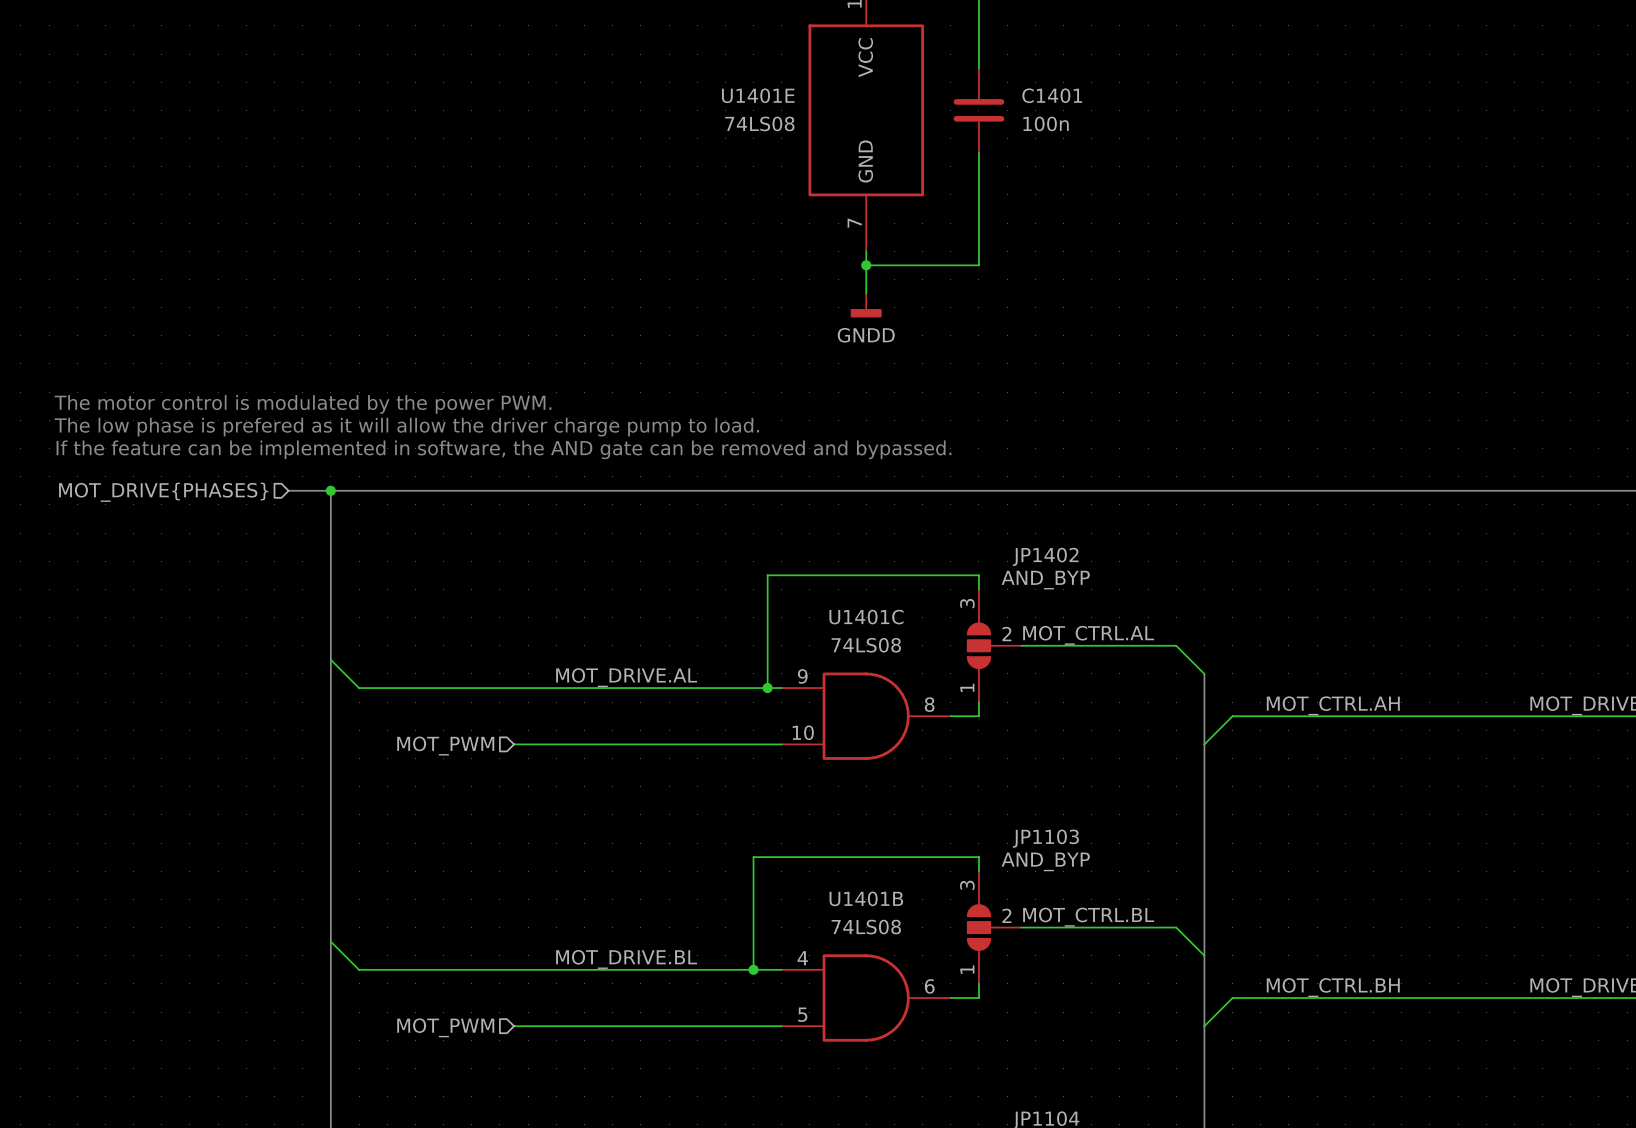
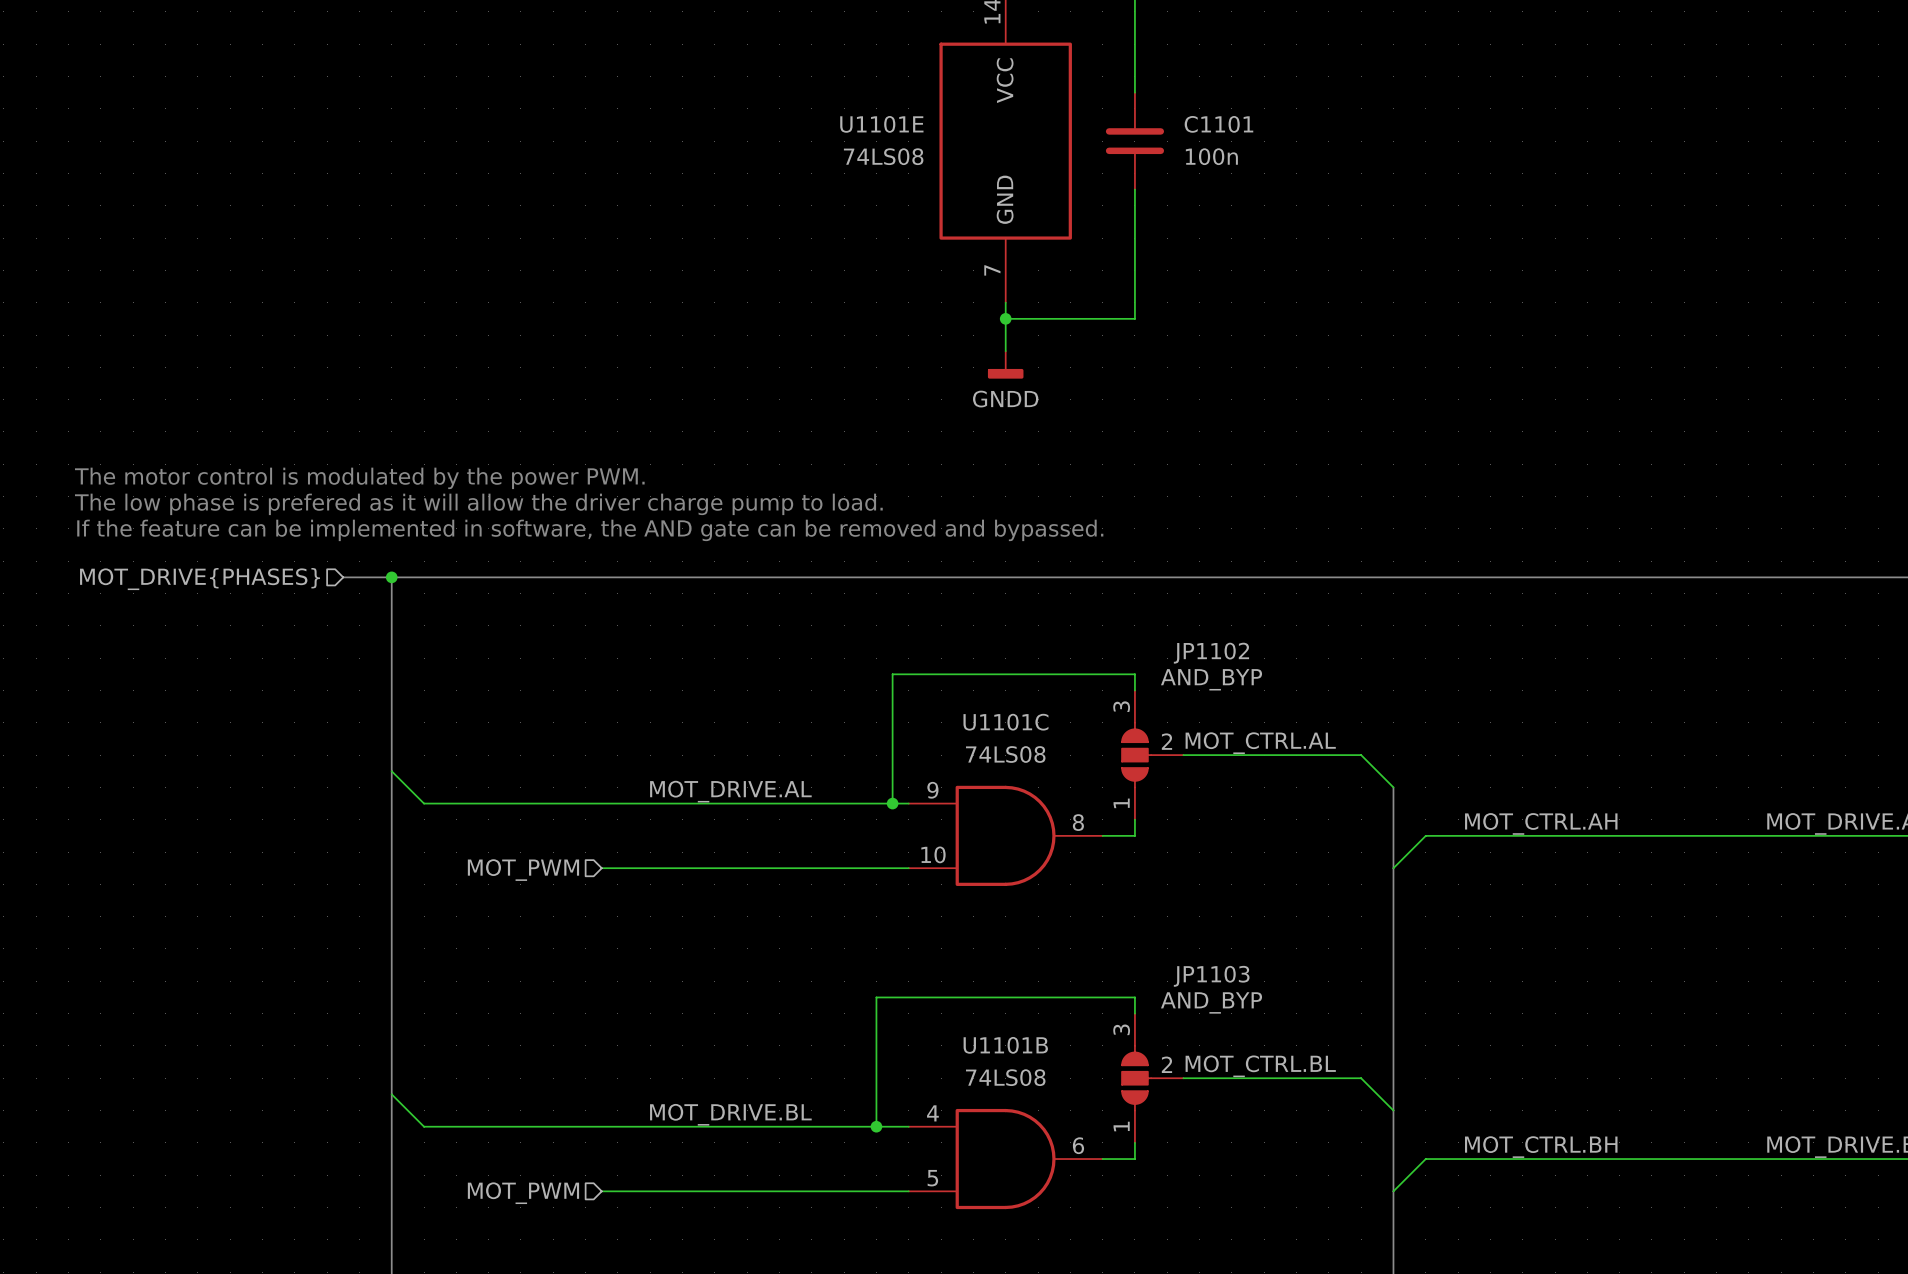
U1401E name: U1401E (758, 95) -> U1101E (881, 124)
C1401 name: C1401 (1052, 95) -> C1101 (1218, 124)
JP1402 name: JP1402 (1045, 556) -> JP1102 (1211, 653)
U1401C name: U1401C (866, 617) -> U1101C (1005, 722)
U1401B name: U1401B (866, 898) -> U1101B (1005, 1045)

